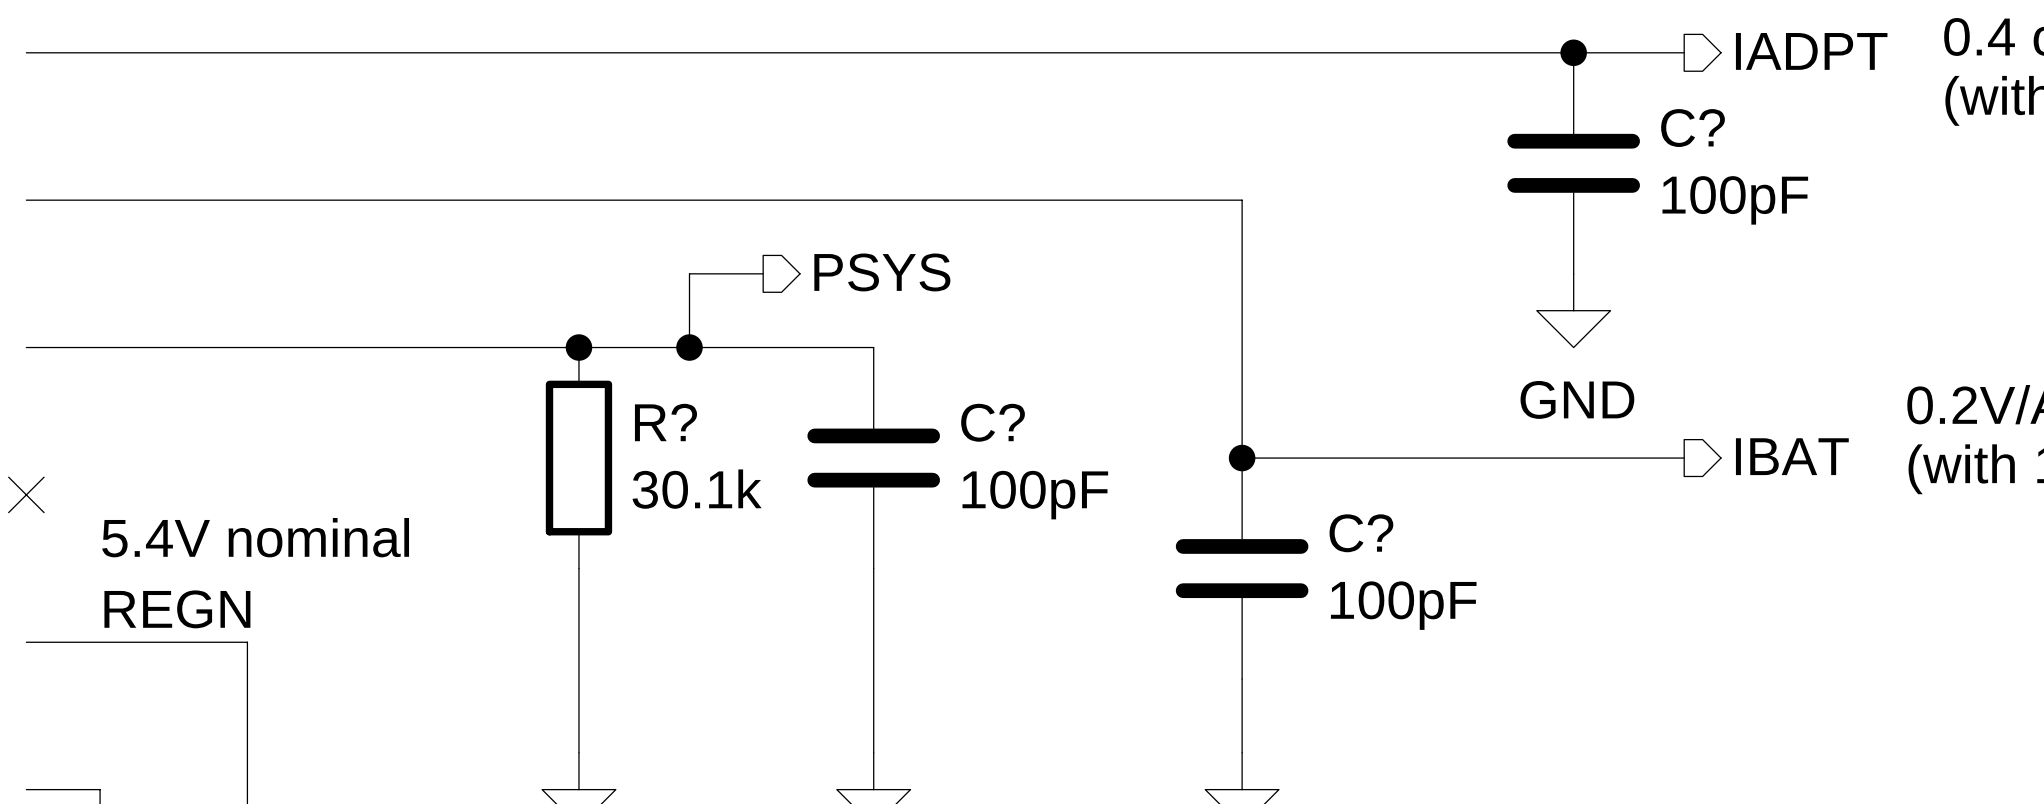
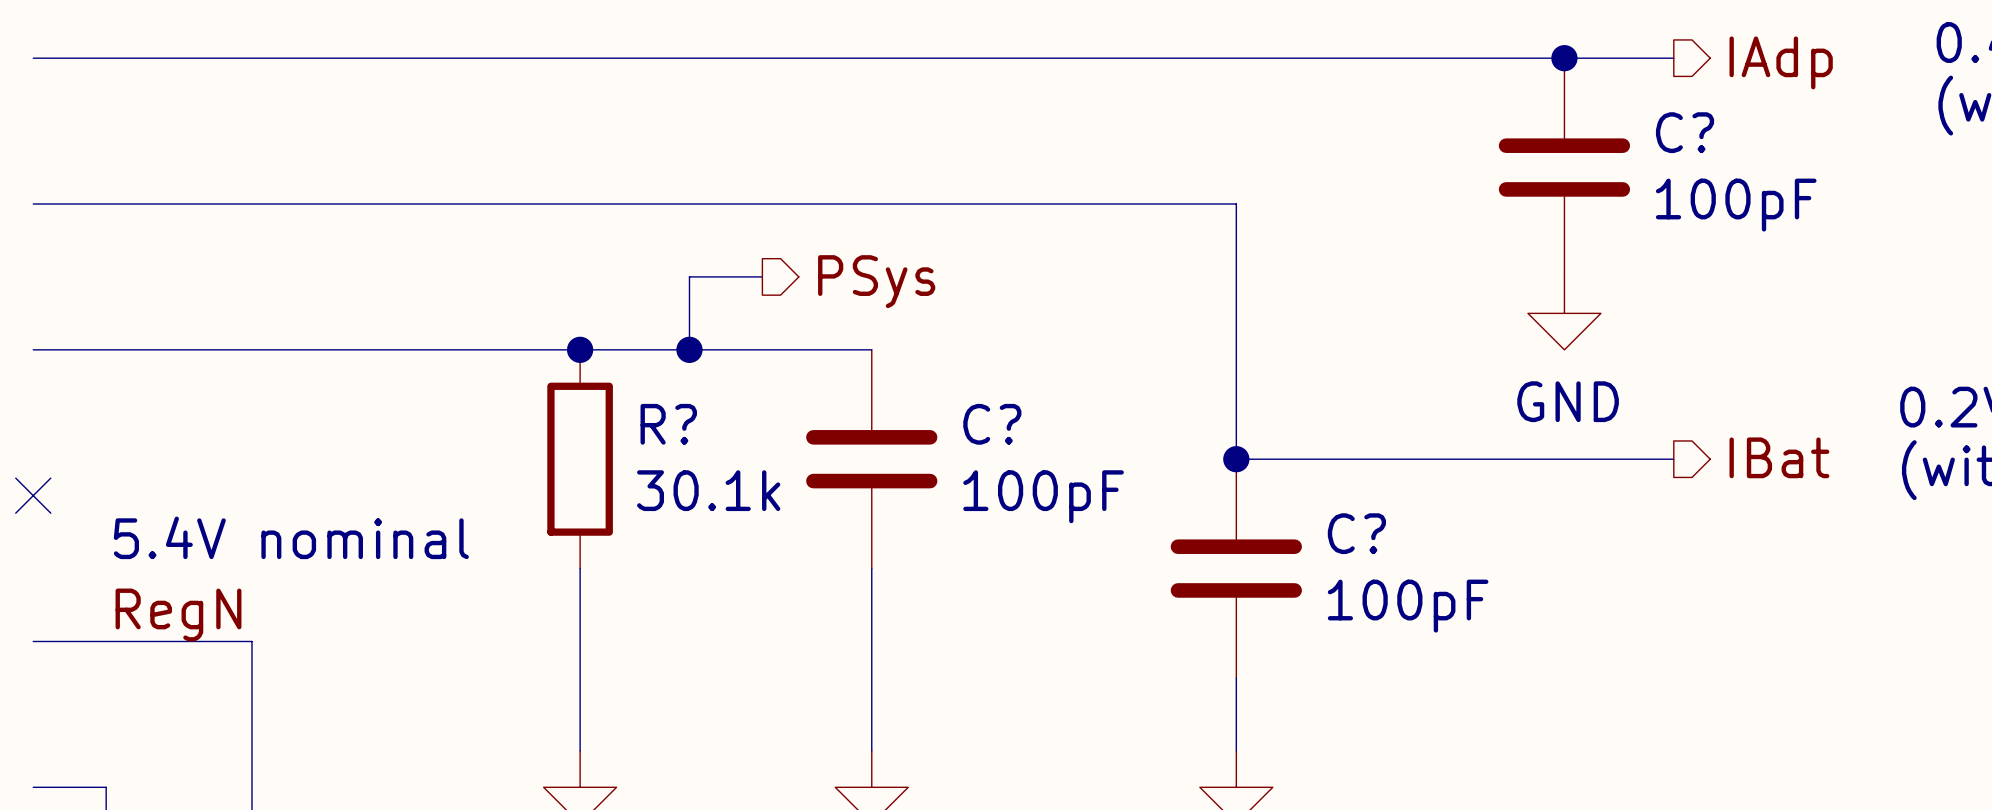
hierarchical label: IADPT (1811, 51) -> IAdp (1781, 62)
hierarchical label: PSYS (882, 272) -> PSys (876, 281)
hierarchical label: IBAT (1792, 456) -> IBat (1779, 457)
label: REGN (177, 609) -> RegN (178, 615)

